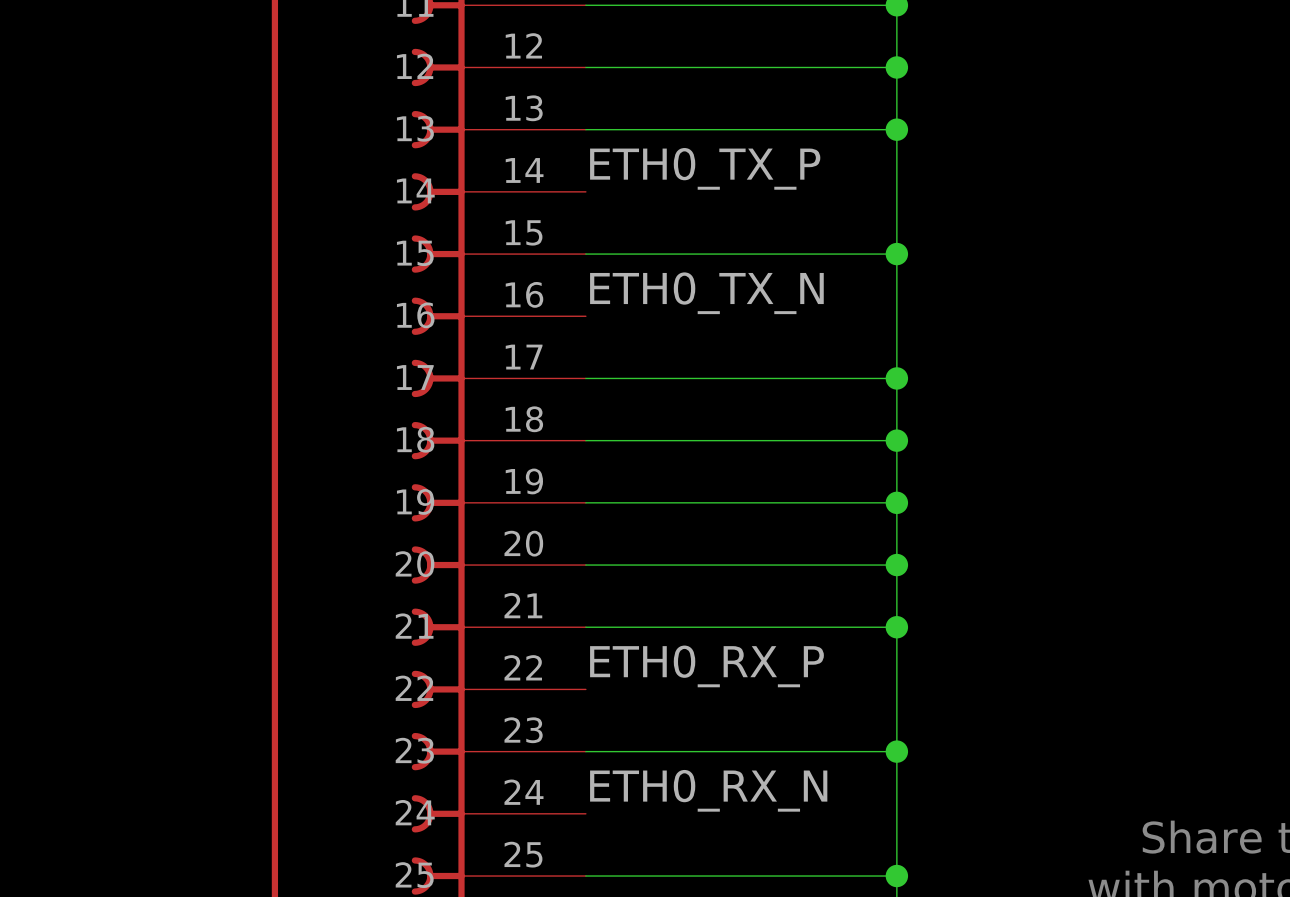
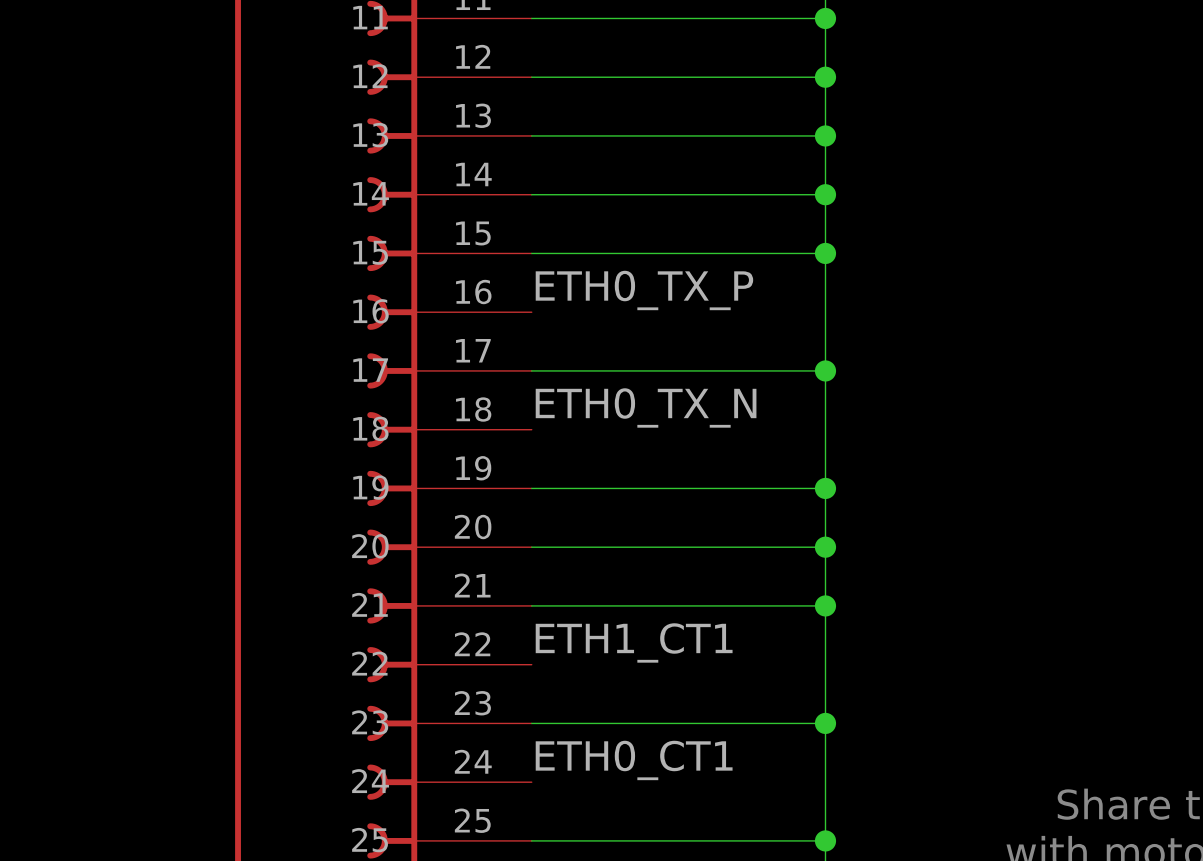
label: ETH0_TX_P (705, 168) -> none
junction: none -> (825, 194)
label: ETH0_TX_N (706, 293) -> ETH0_TX_P (644, 290)
label: none -> ETH0_TX_N (646, 407)
wire: (585, 440) (896, 440) -> (531, 194) (825, 194)
junction: (896, 440) -> none
label: ETH0_RX_P (706, 666) -> ETH1_CT1 (634, 642)
label: ETH0_RX_N (708, 790) -> ETH0_CT1 (634, 760)

